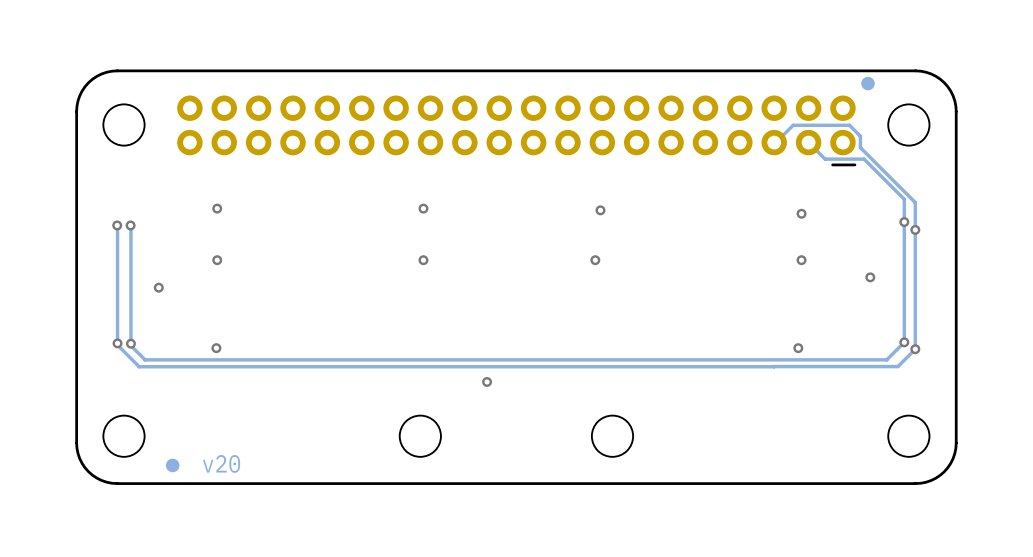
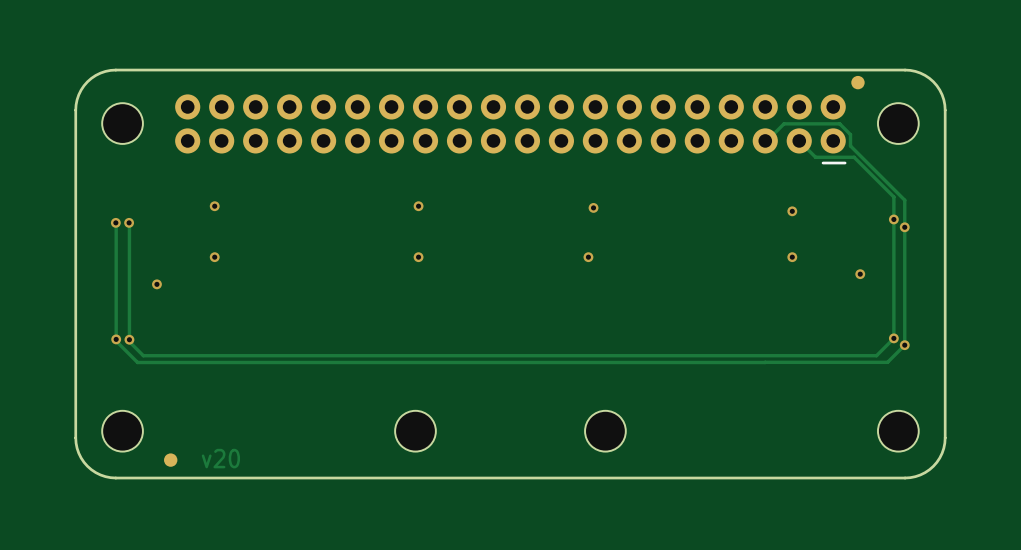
via: (216, 348) -> none
via: (798, 348) -> none
via: (487, 381) -> none

